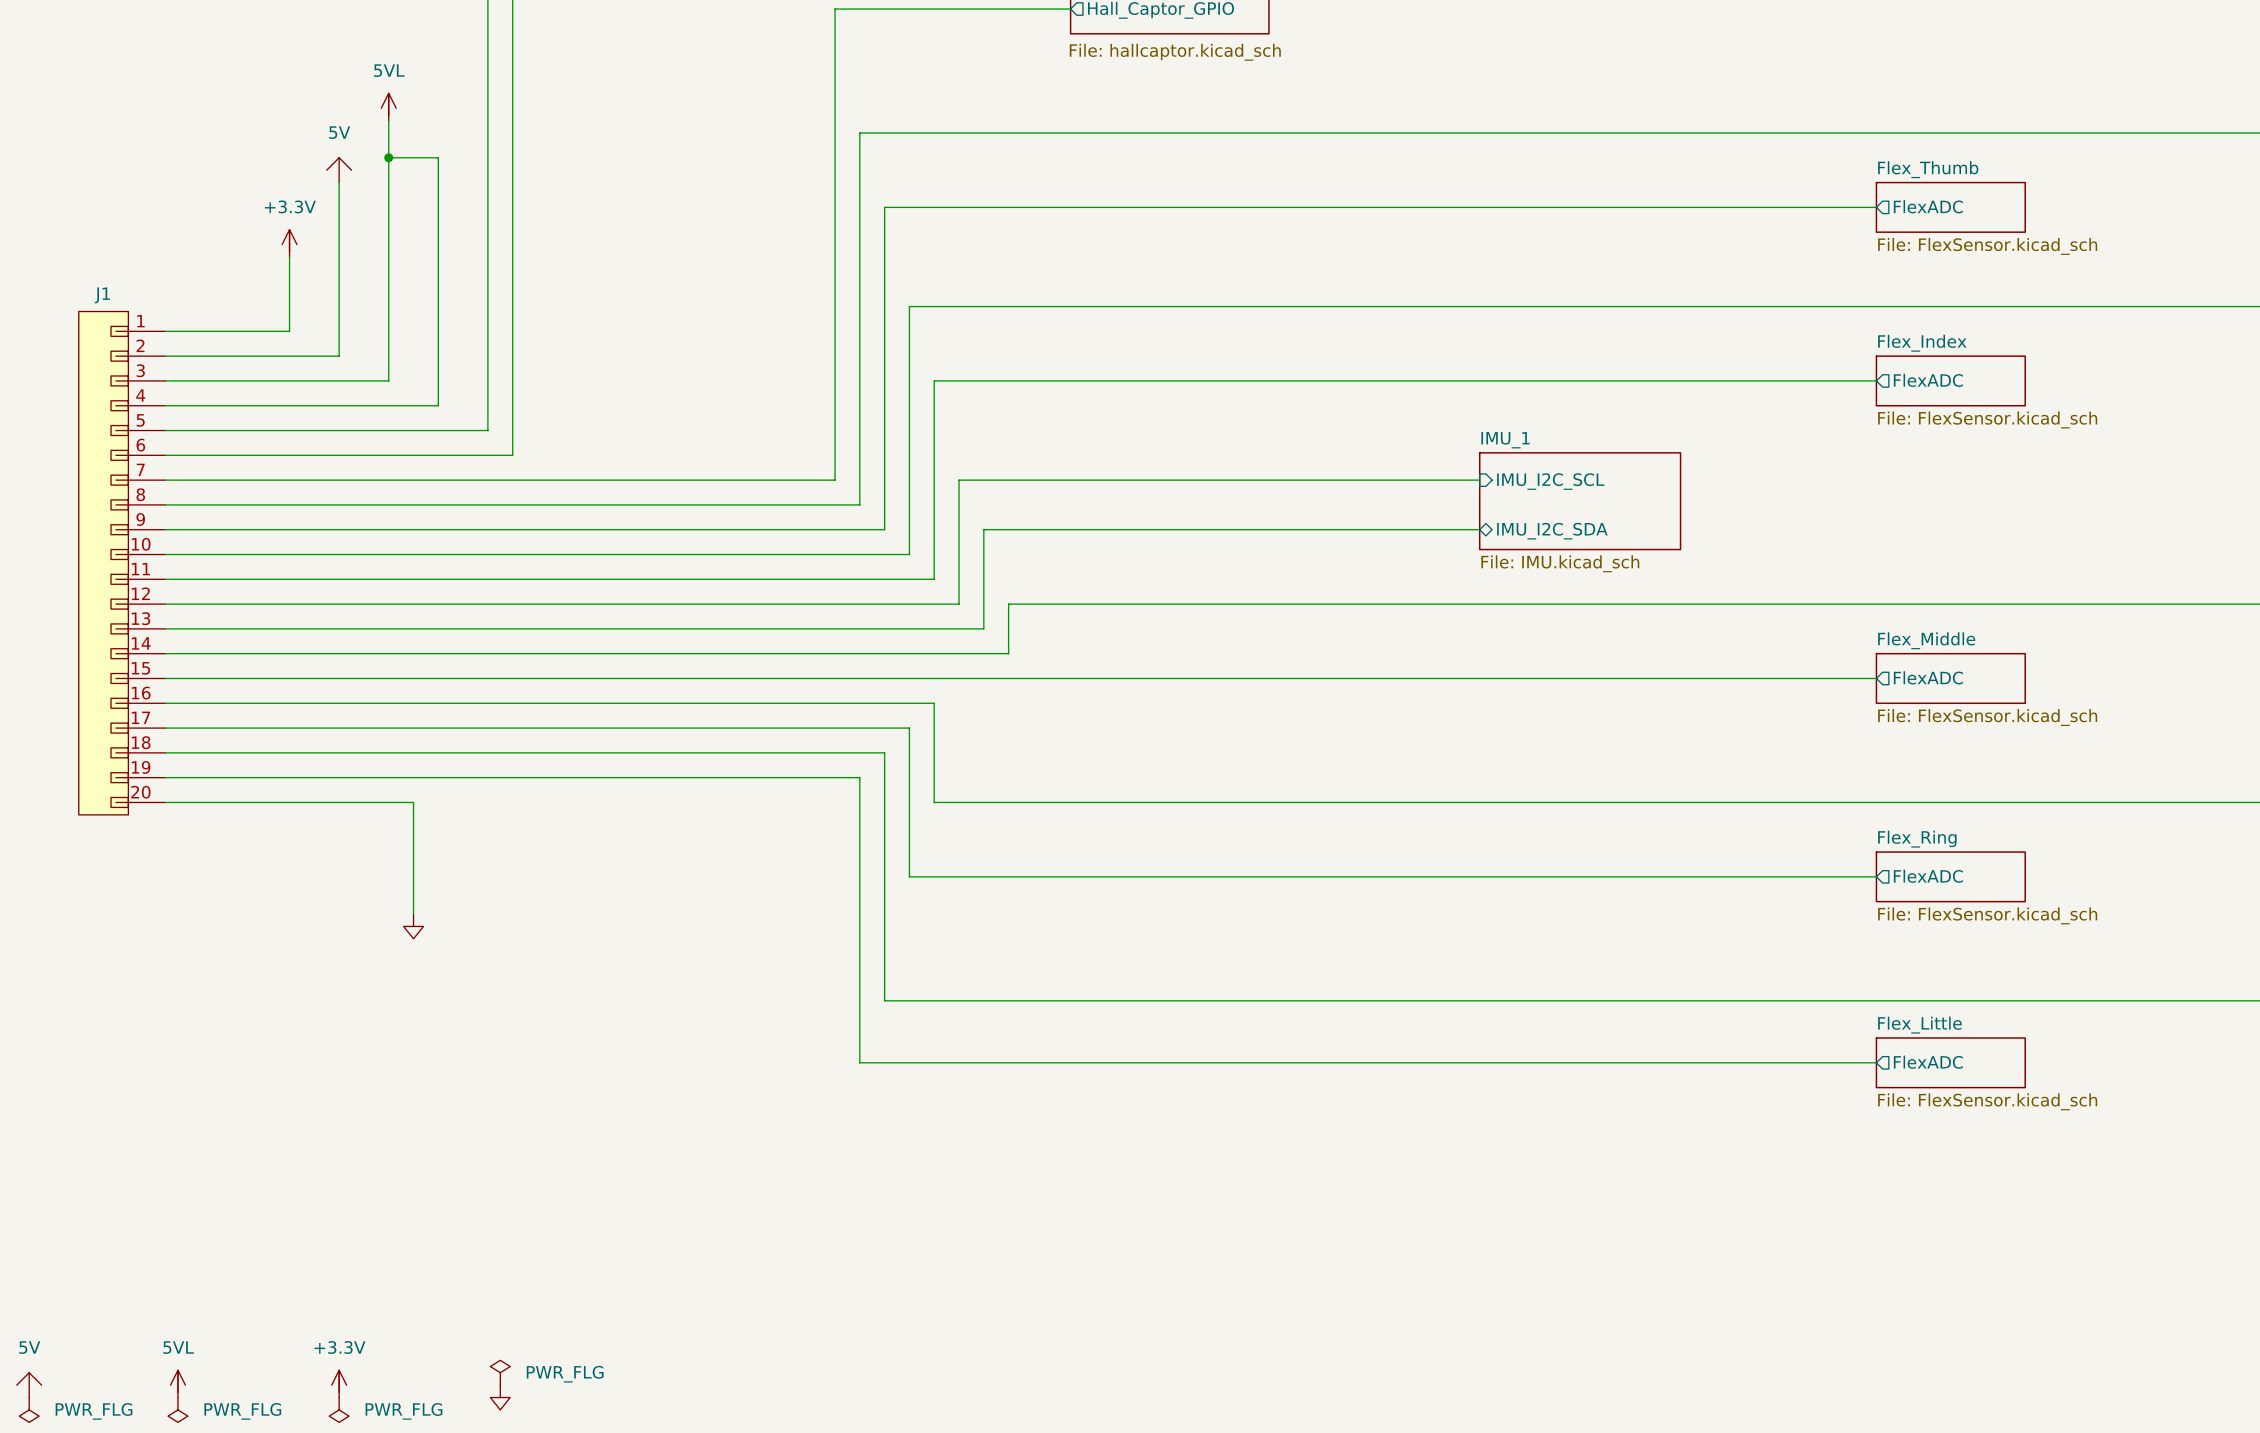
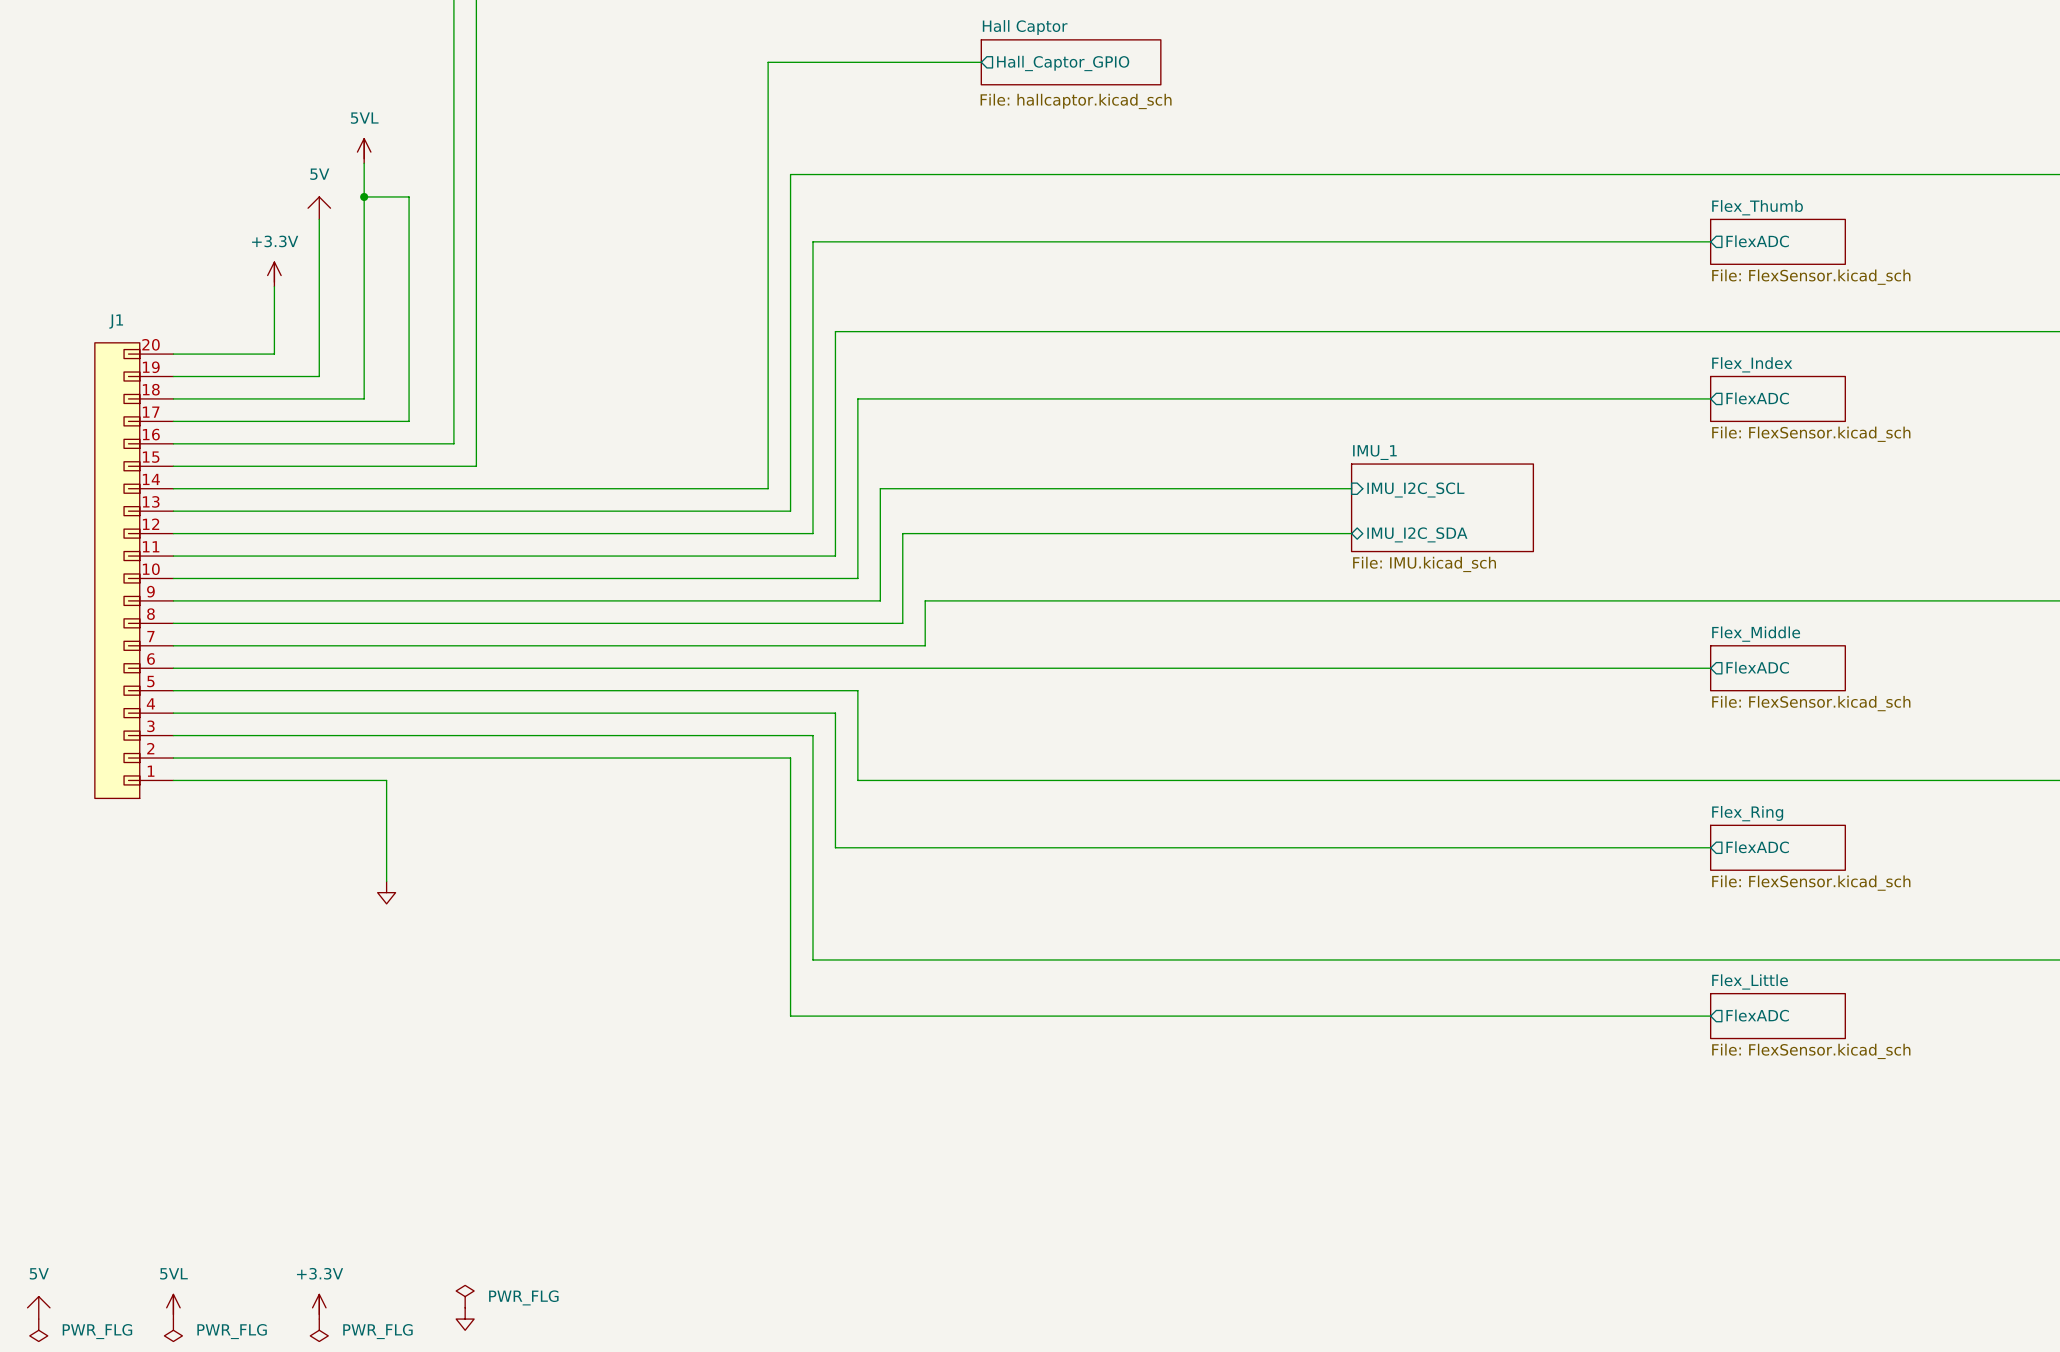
J1 flip: as is (103, 563) -> up-down (117, 570)

